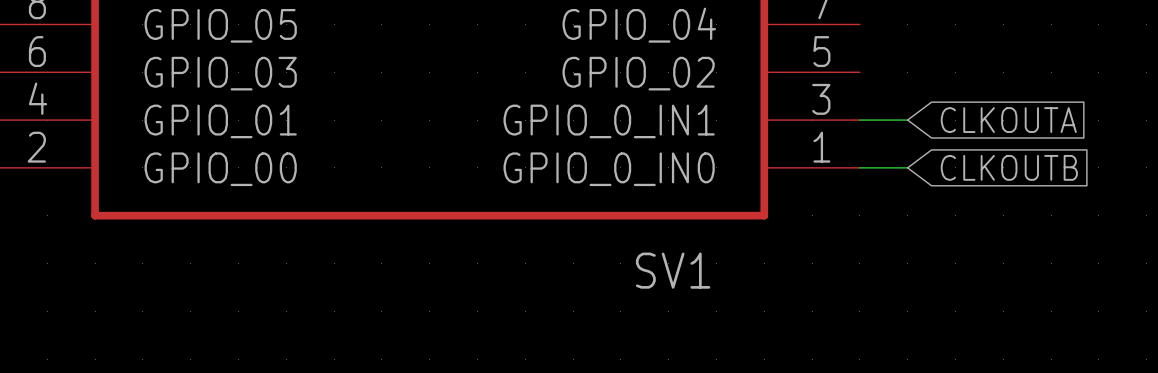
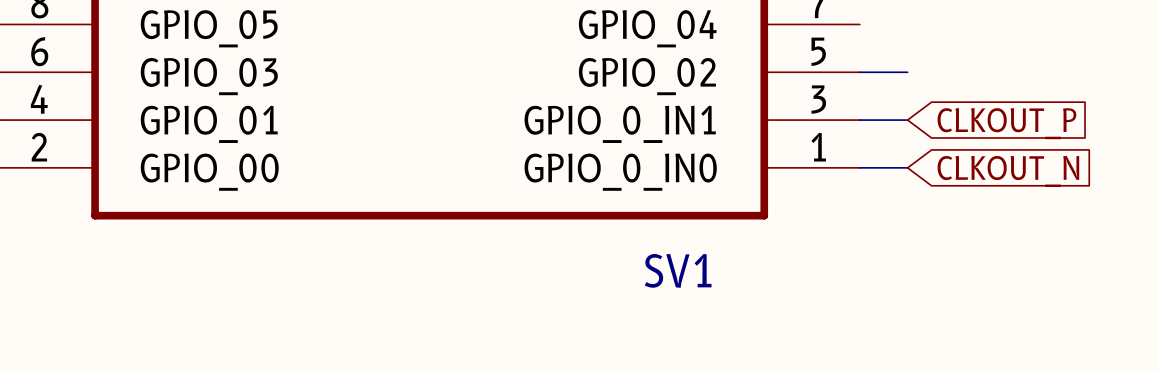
wire: none -> (859, 72) (907, 72)
global label: CLKOUTA (1008, 120) -> CLKOUT_P (1006, 123)
global label: CLKOUTB (1009, 167) -> CLKOUT_N (1008, 171)

